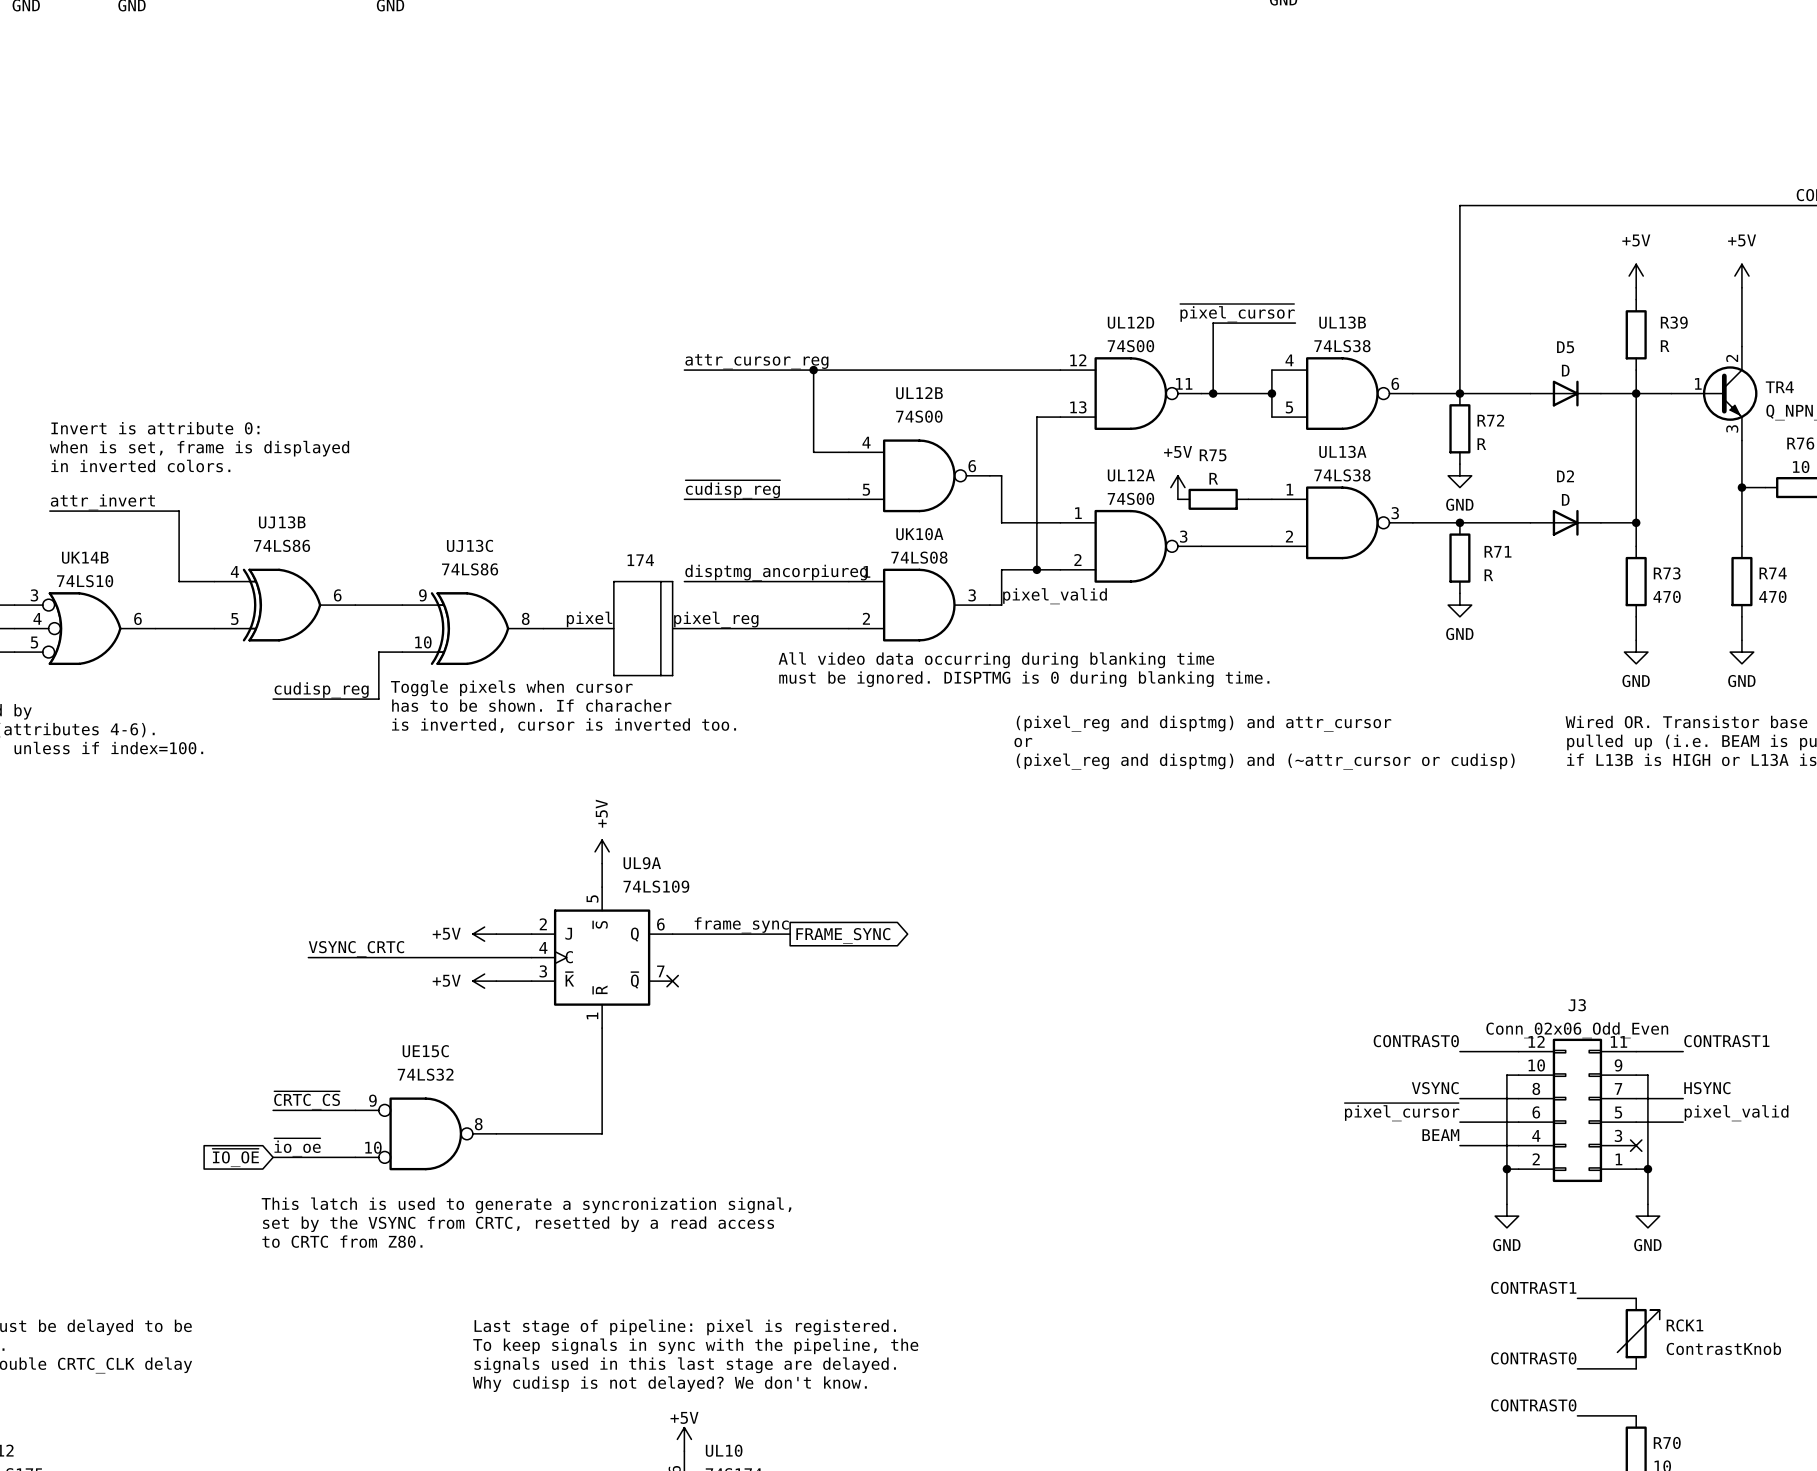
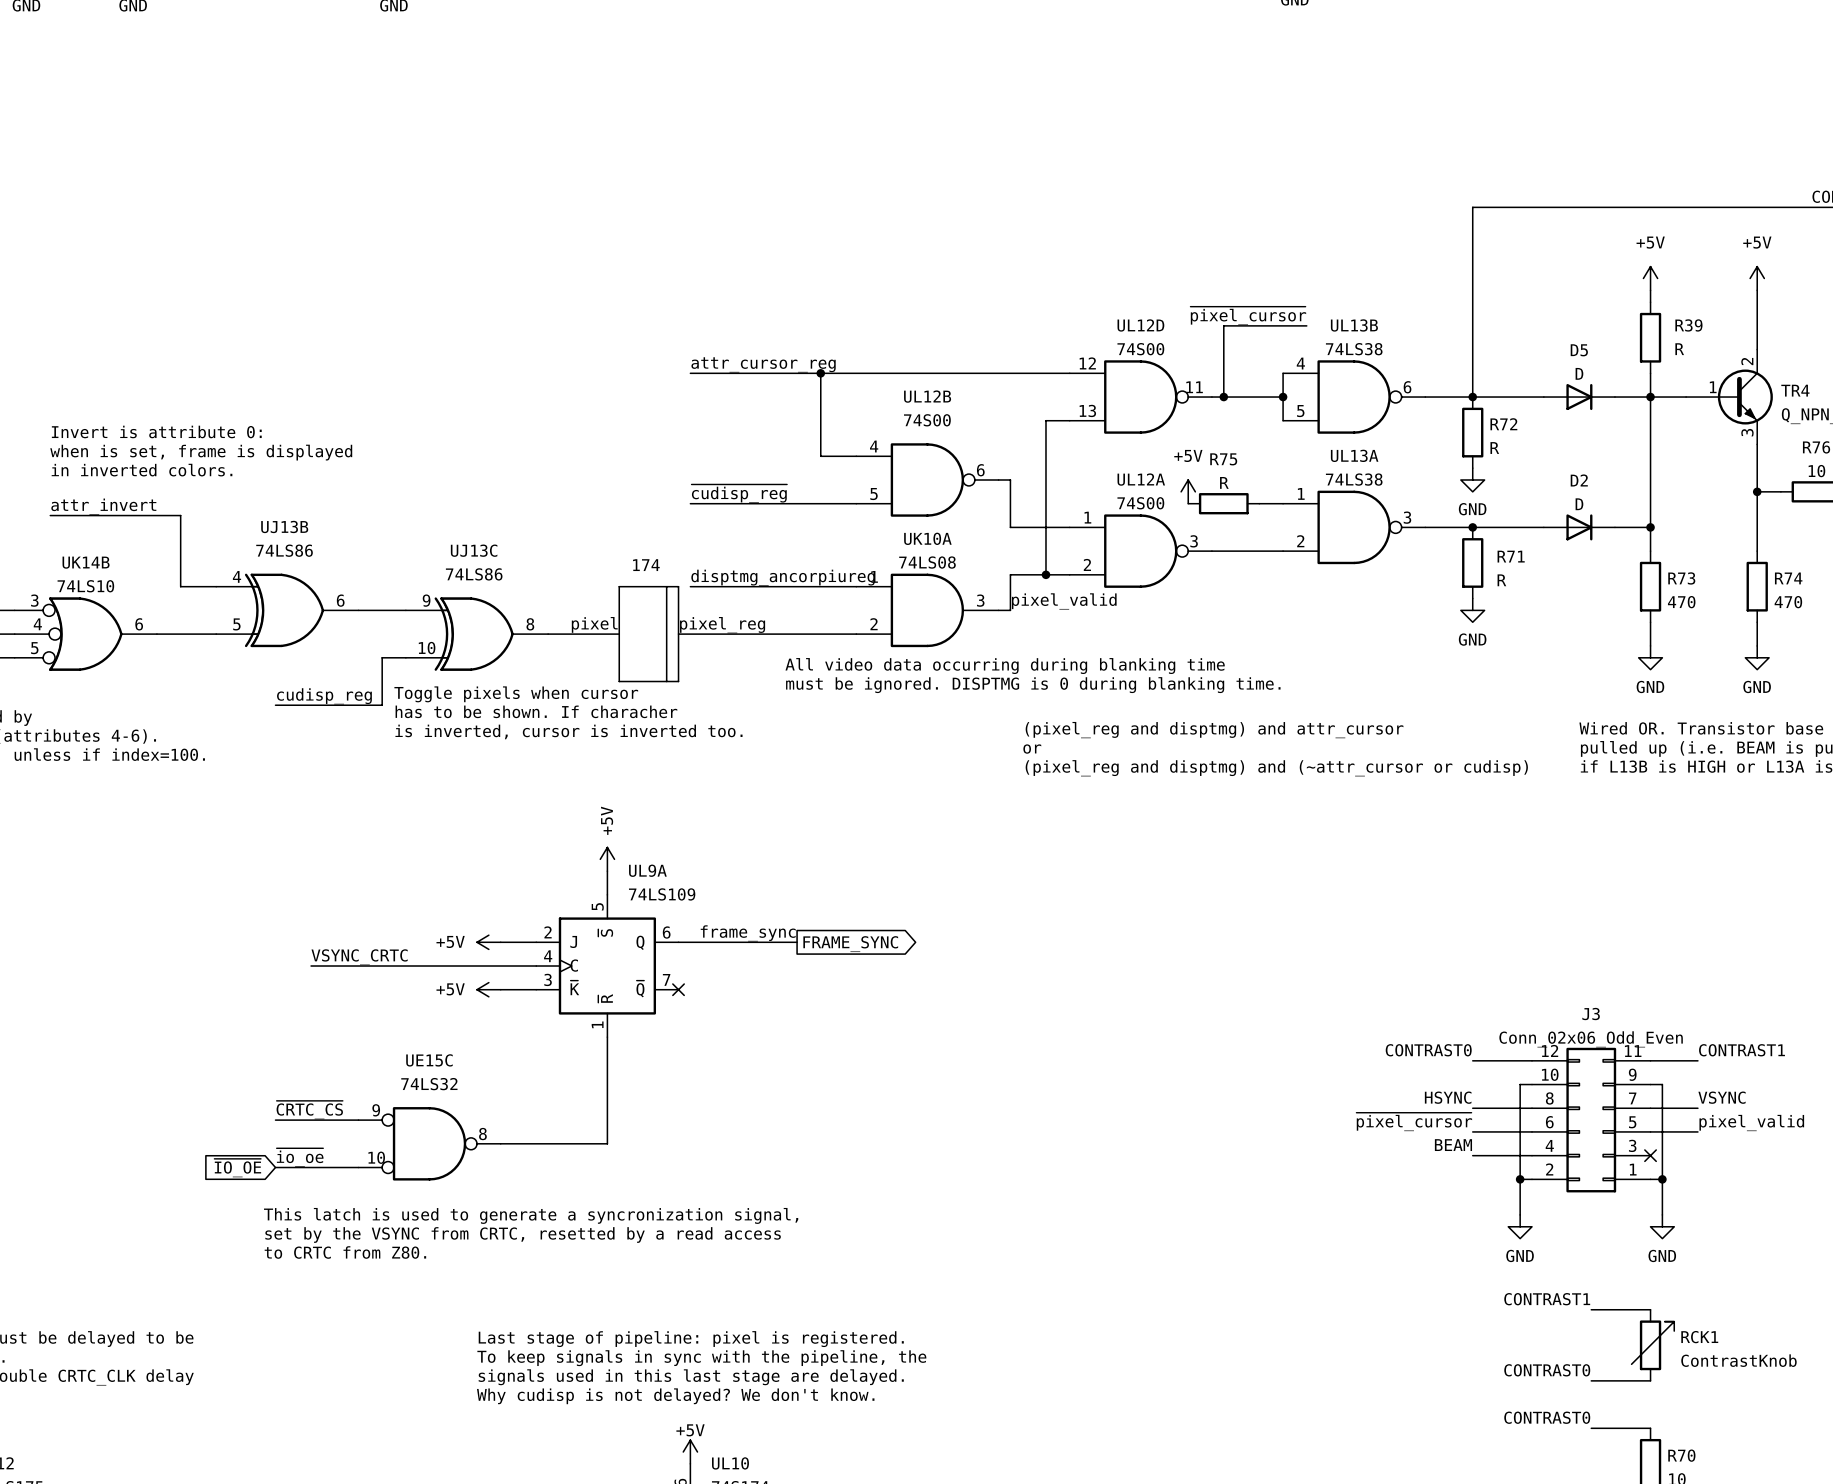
label: VSYNC (1435, 1088) -> HSYNC (1448, 1097)
label: HSYNC (1707, 1088) -> VSYNC (1722, 1097)

